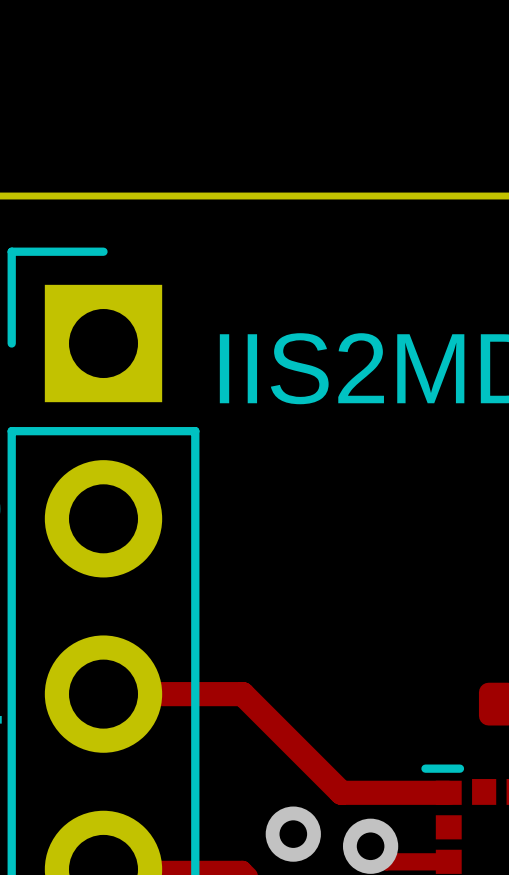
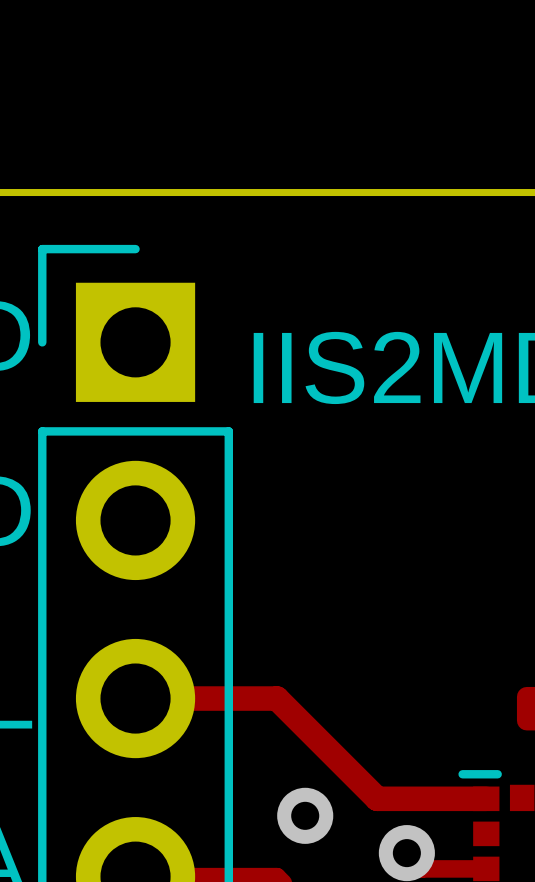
via position: (293, 834) -> (305, 815)

